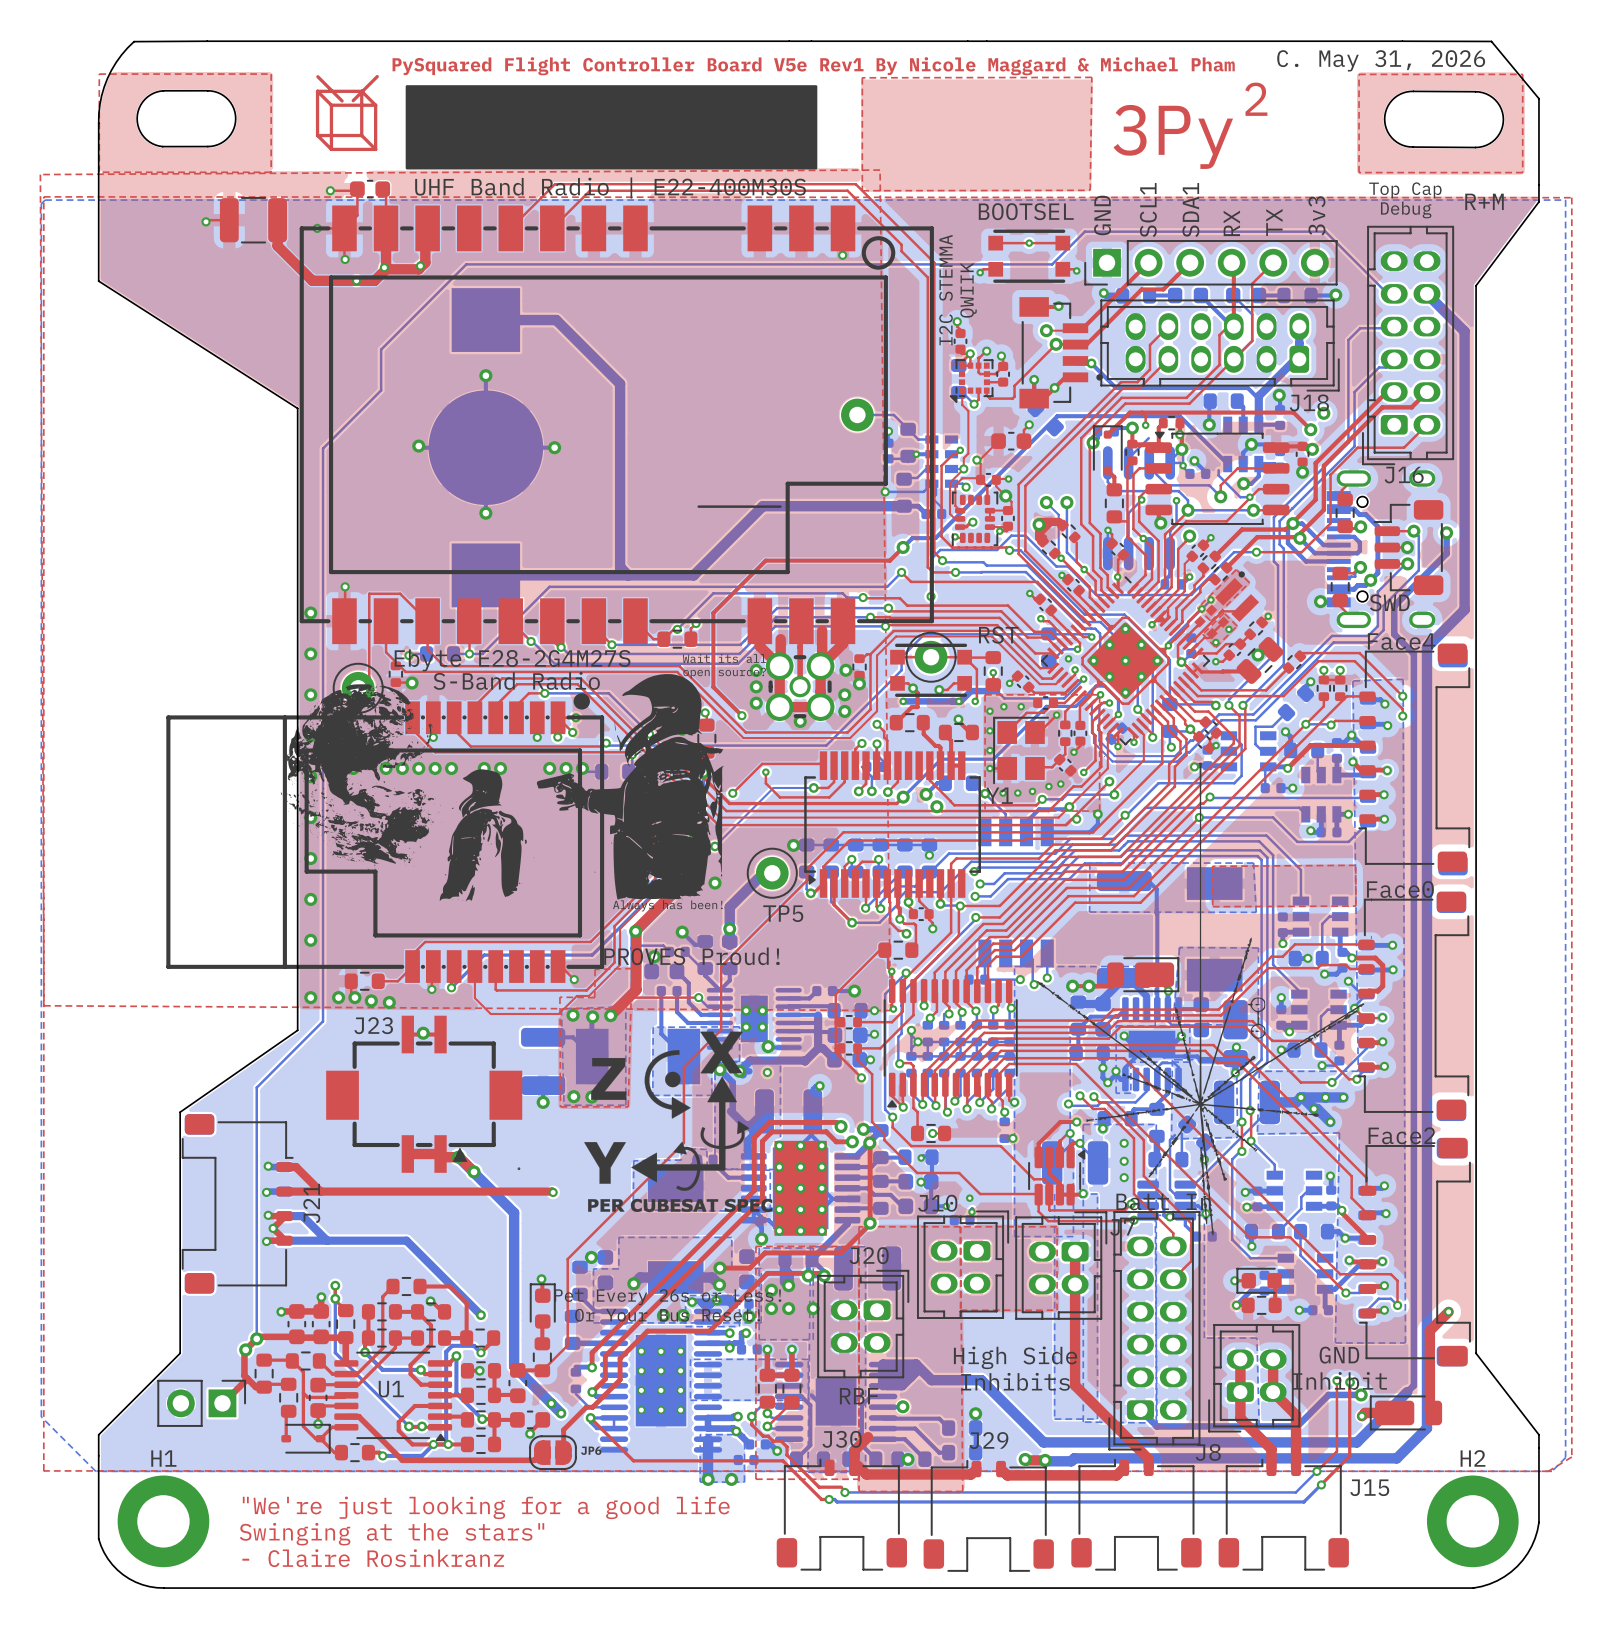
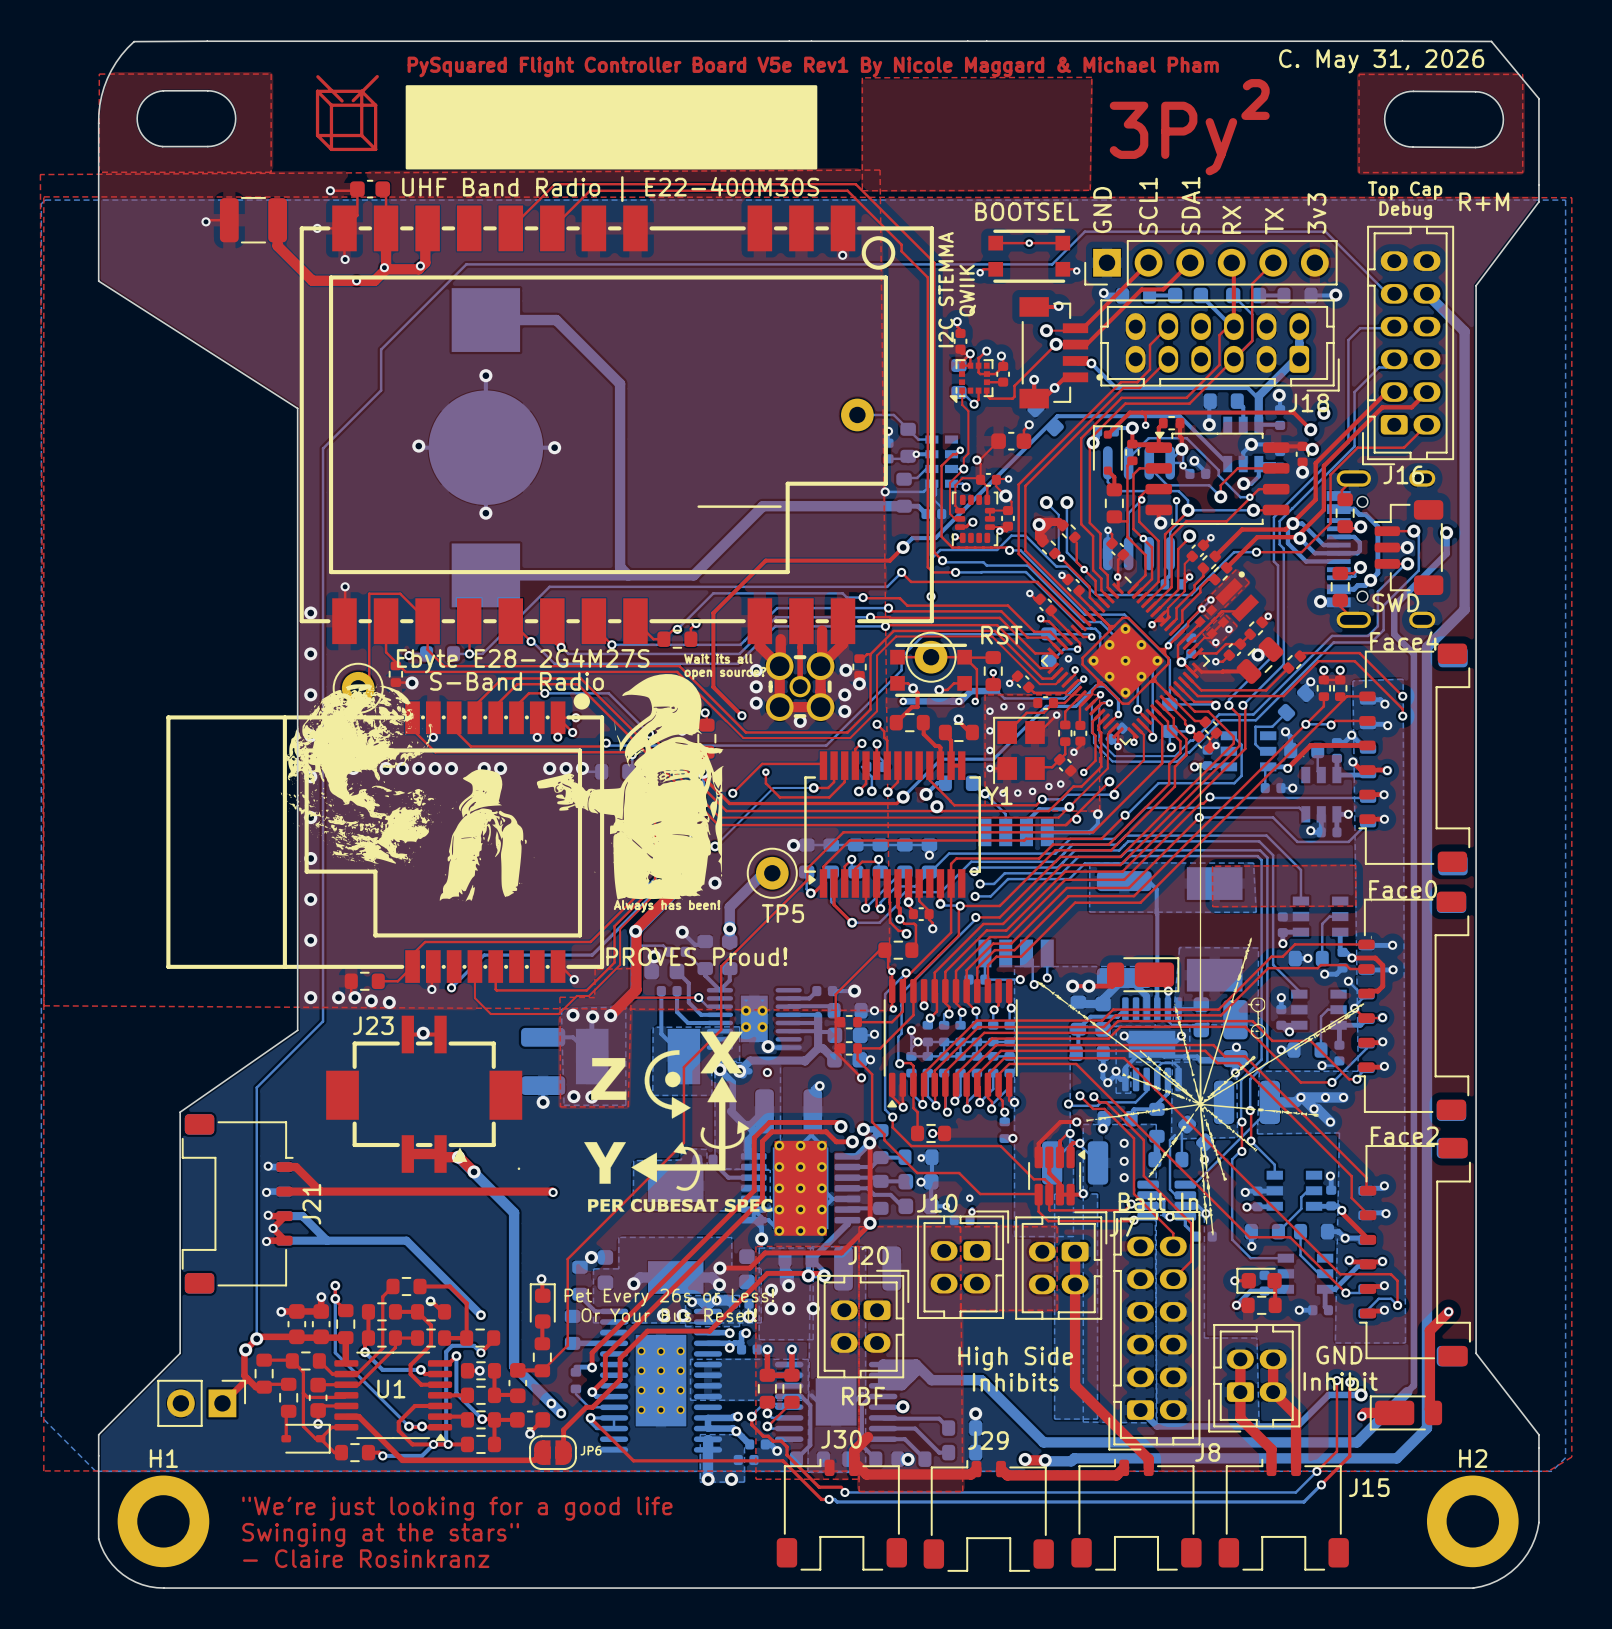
via: (1179, 434) -> none
bottom track: none -> (1148, 438) (1186, 438) (1218, 470)

